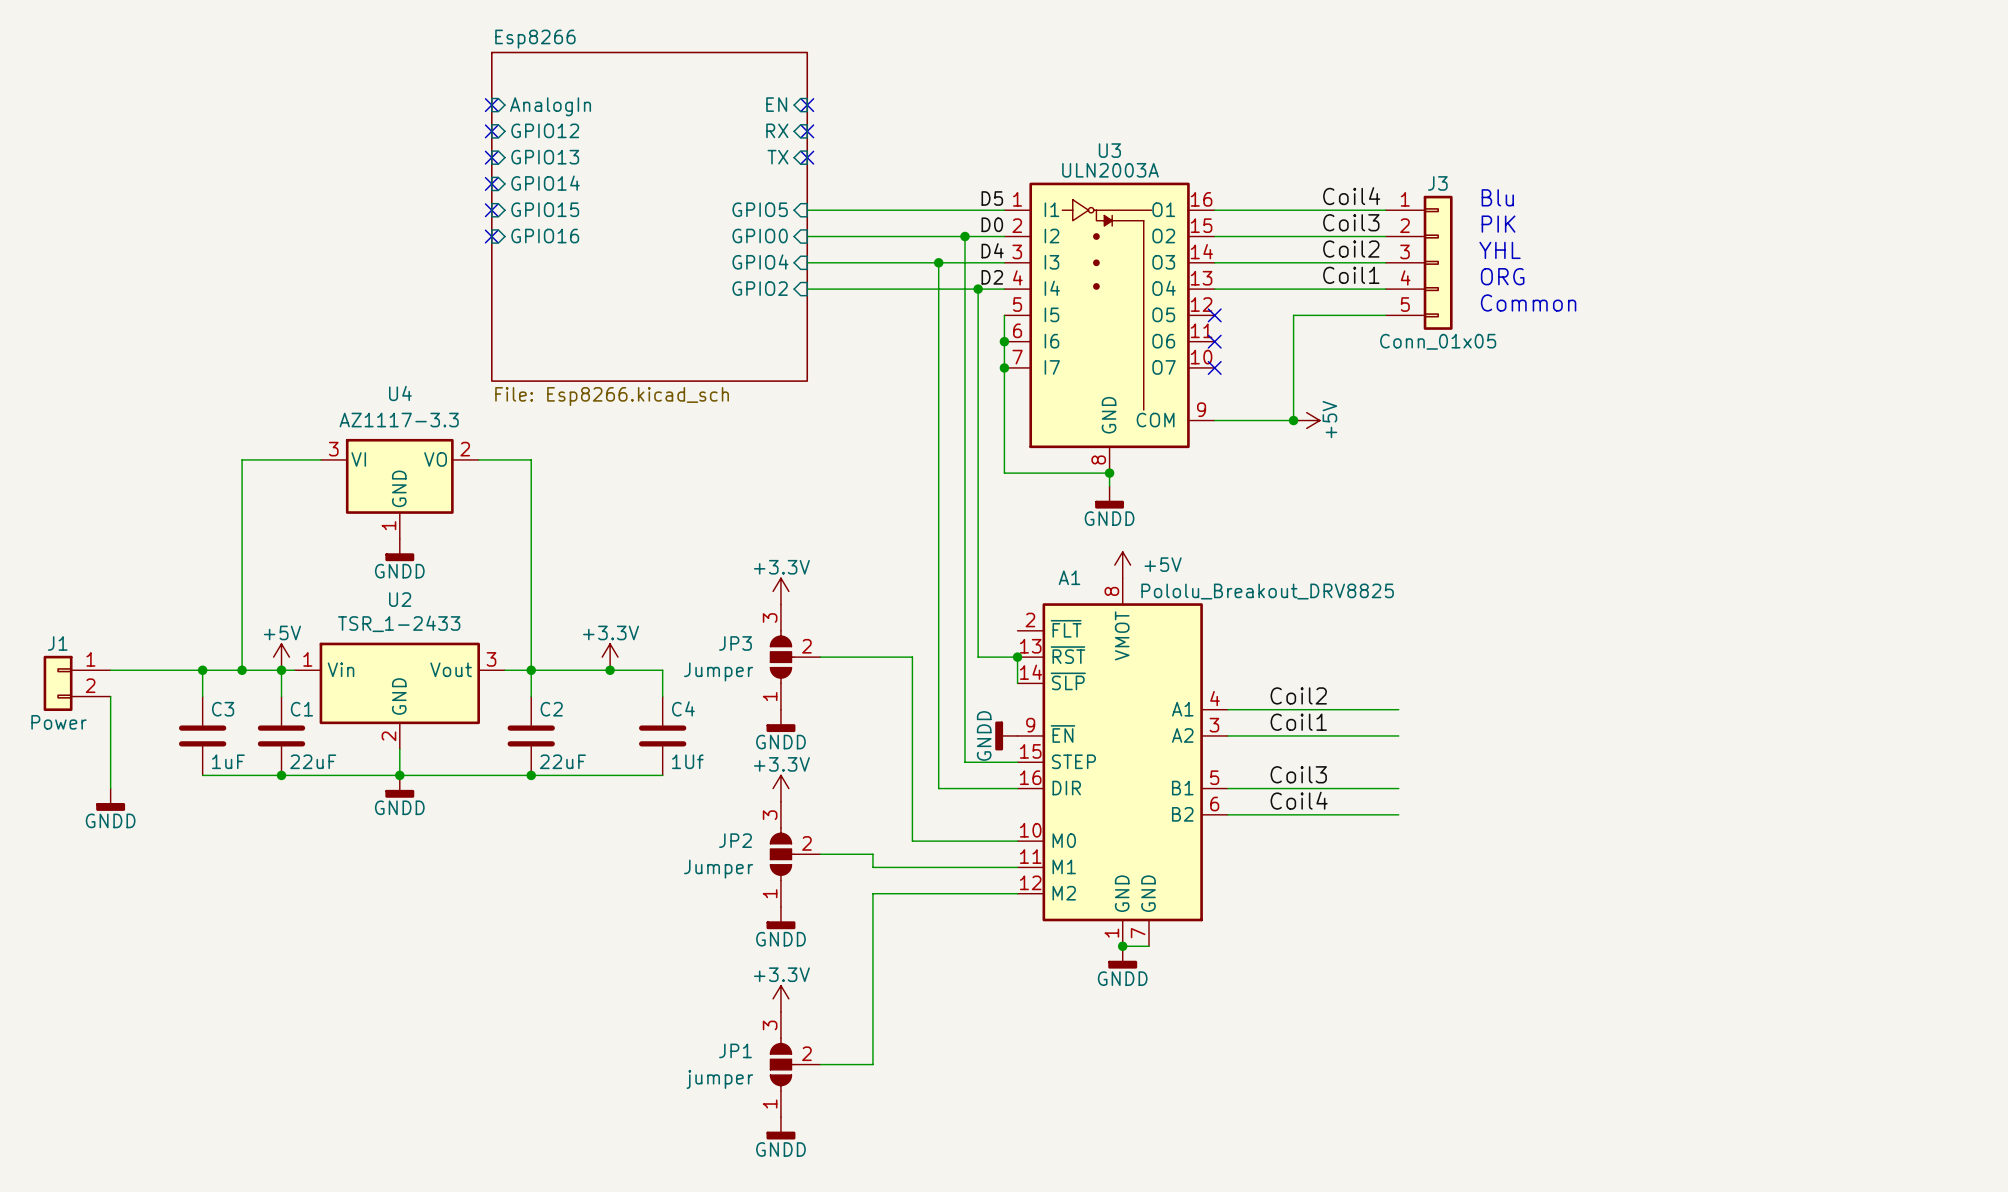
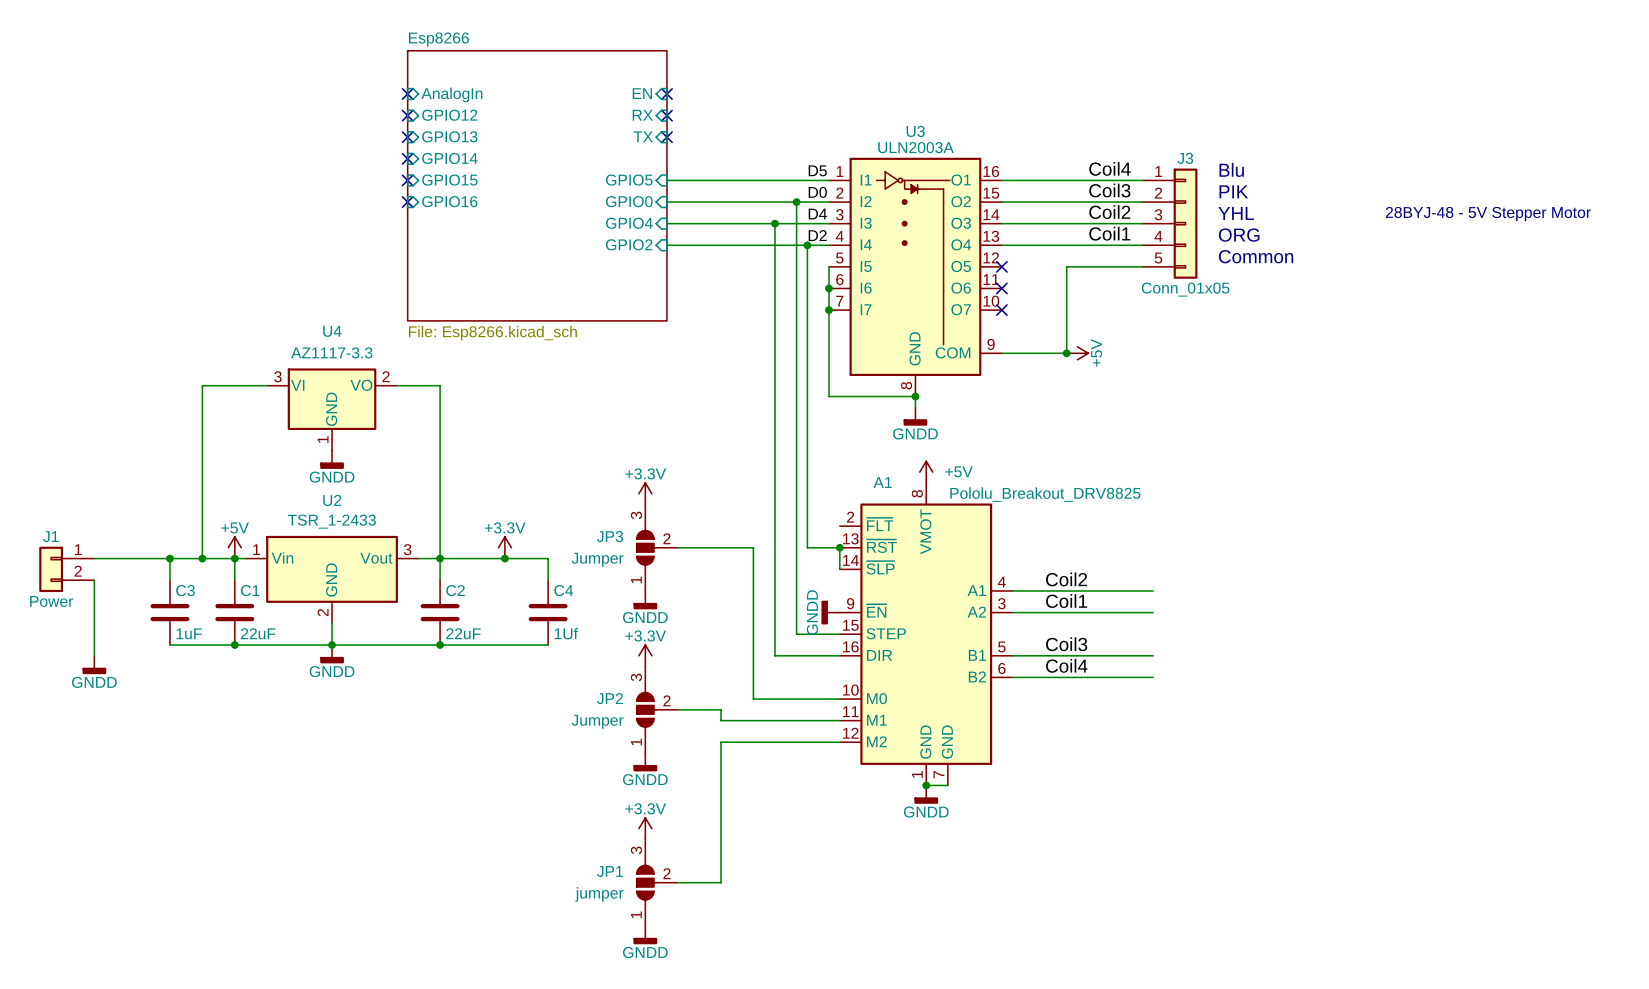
text: none -> 28BYJ-48 - 5V Stepper Motor (1488, 214)

